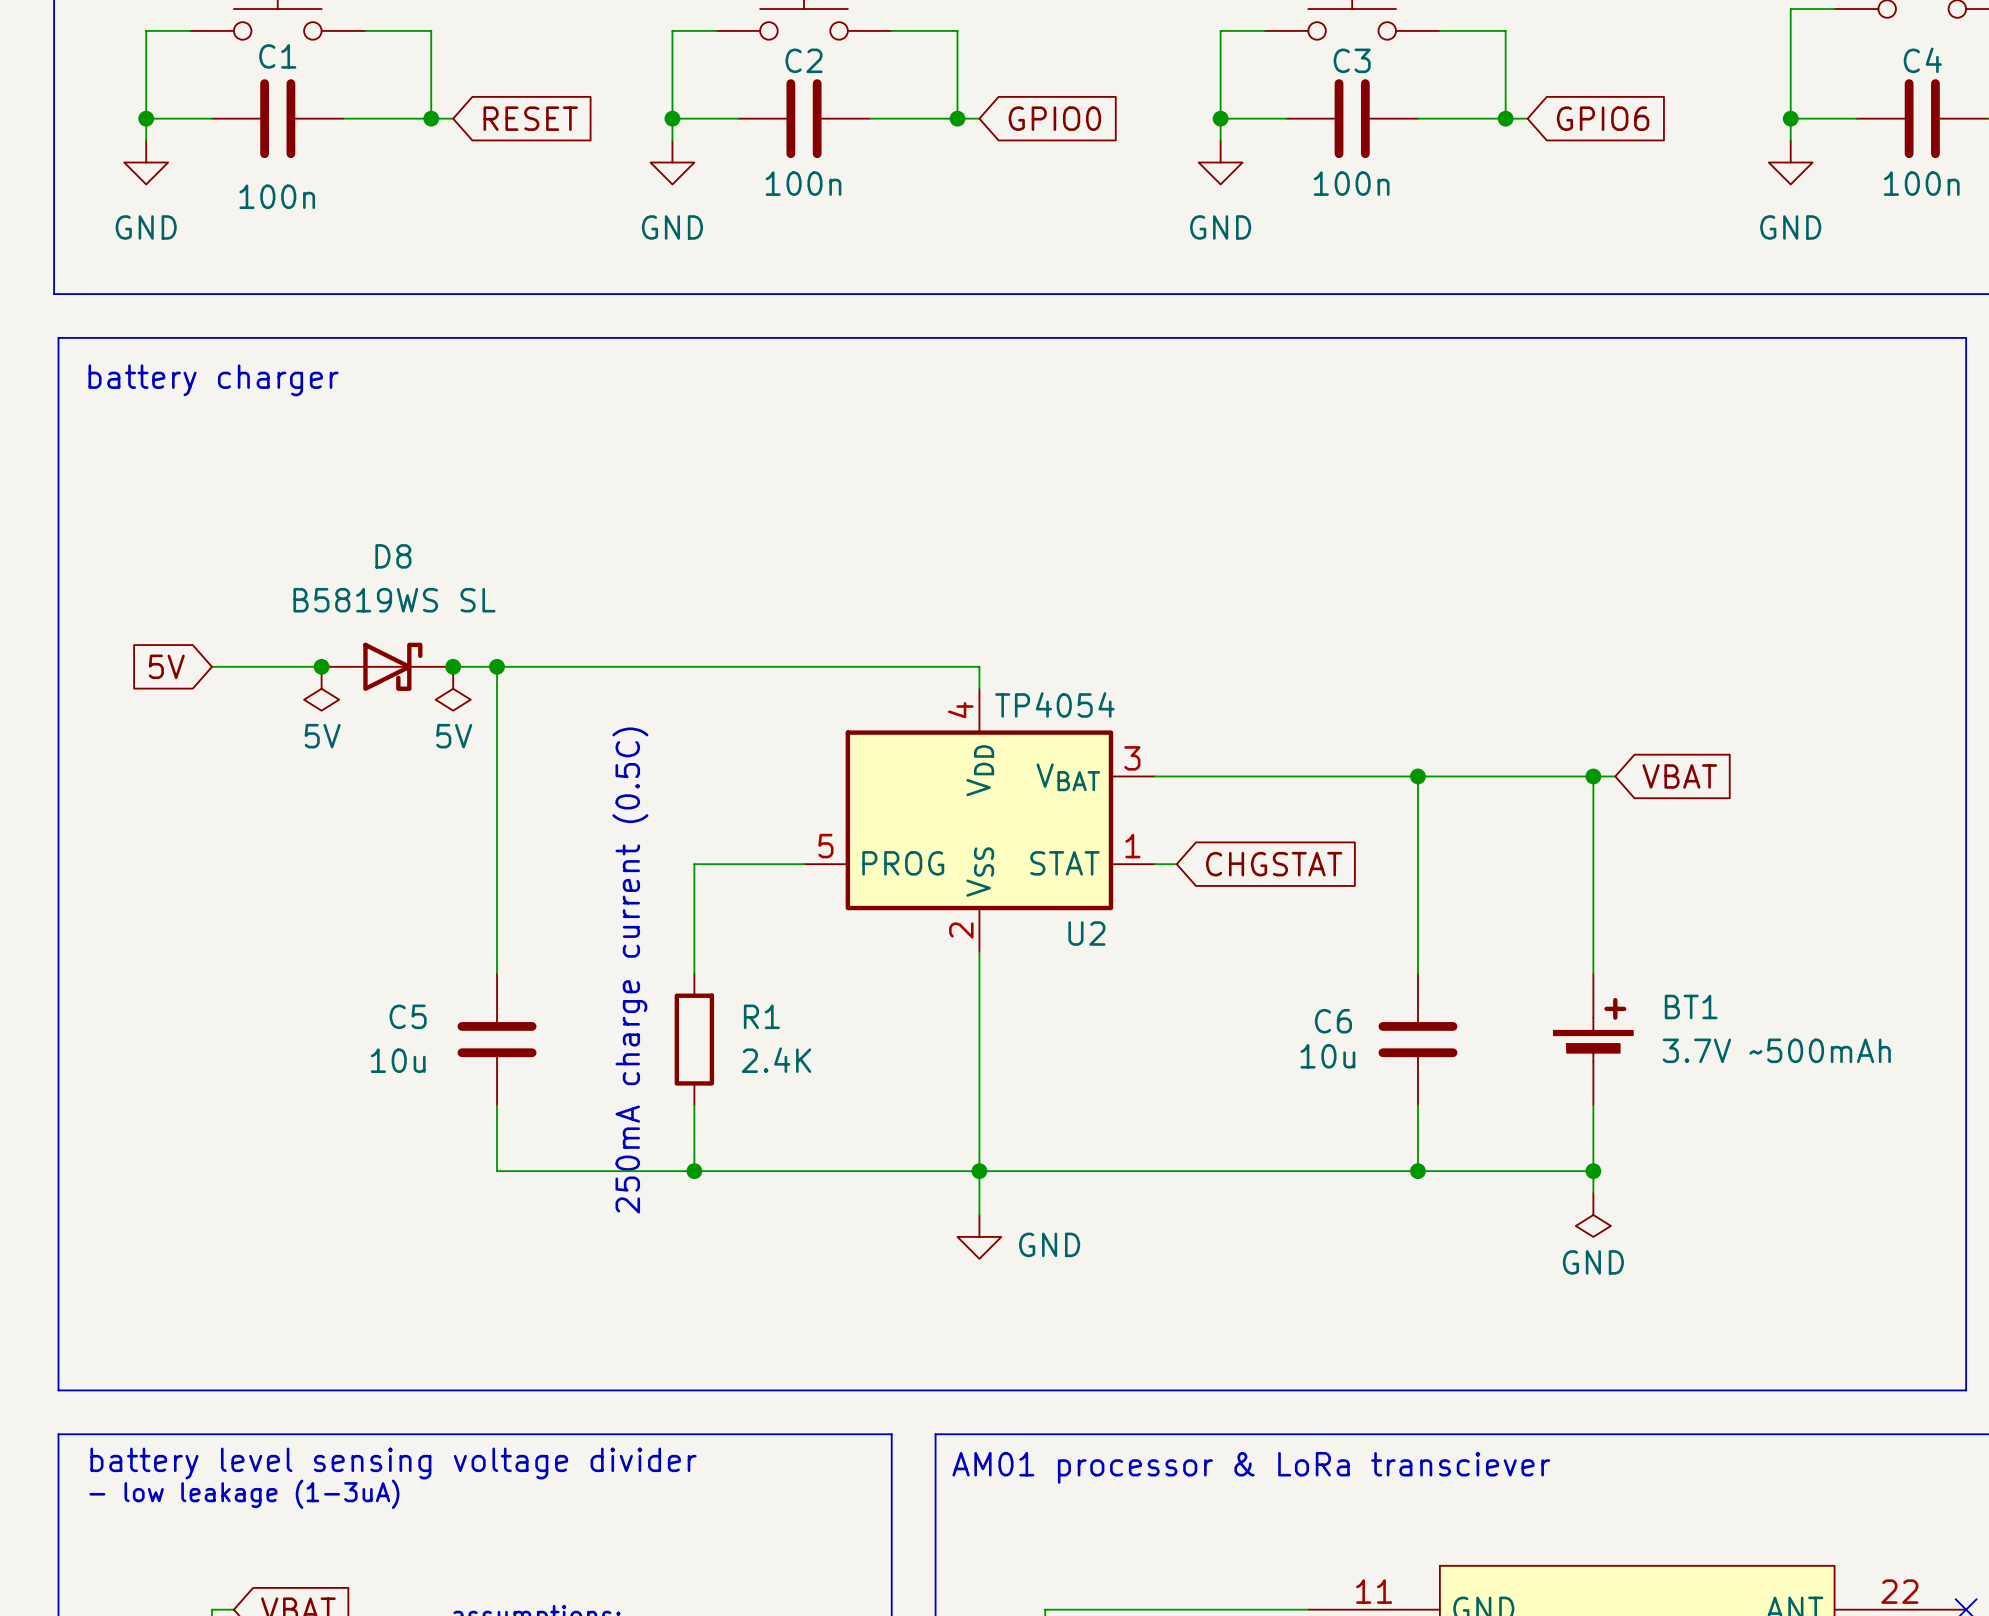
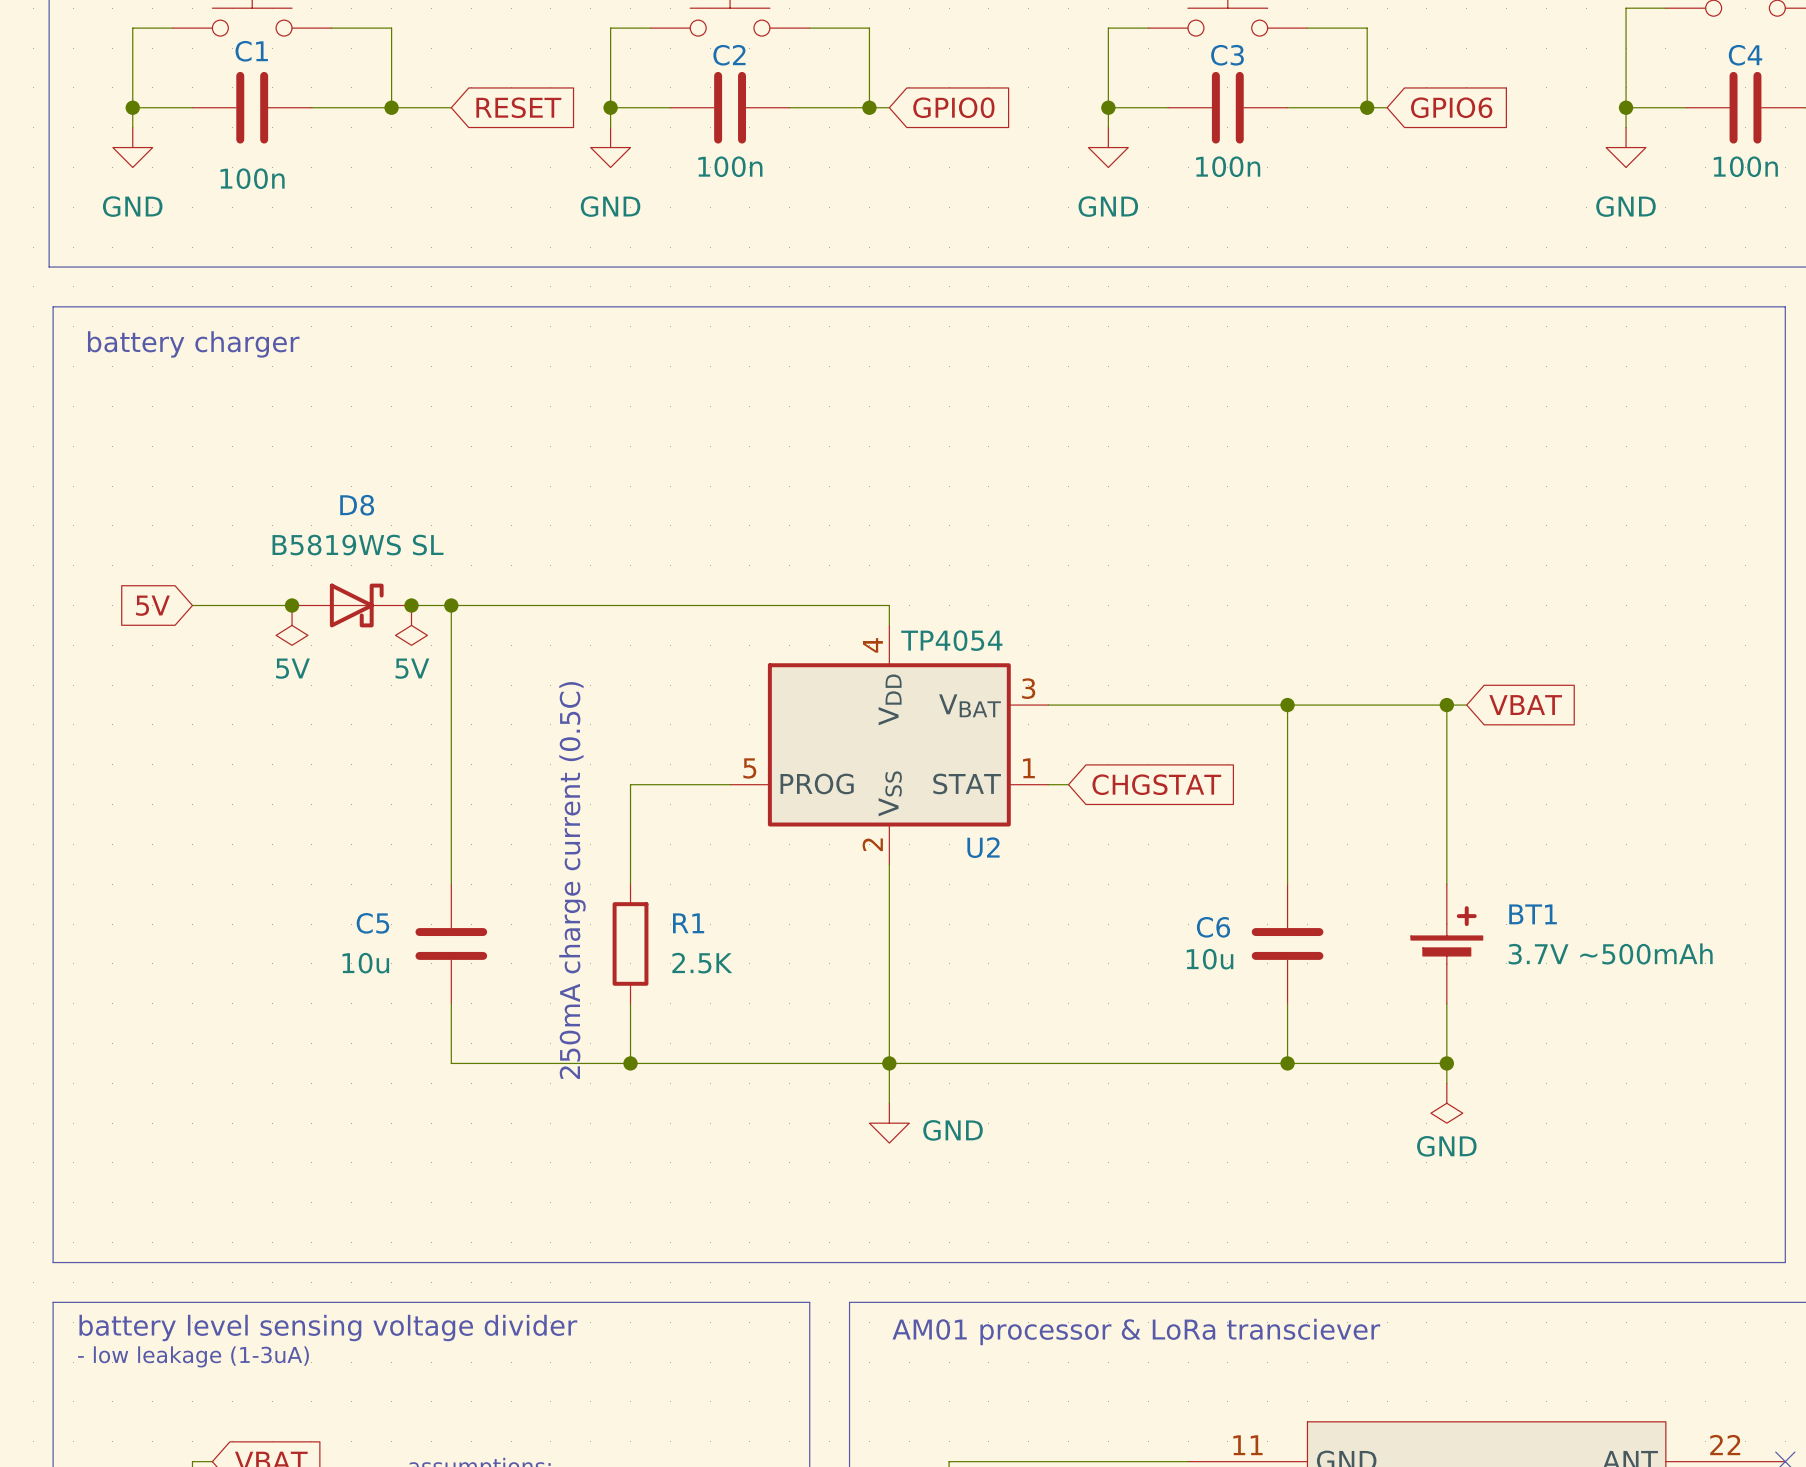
wire: none -> (411, 107) (451, 107)
global label position: RESET (530, 118) -> RESET (518, 107)
R1 value: 2.4K (776, 1060) -> 2.5K (702, 963)

